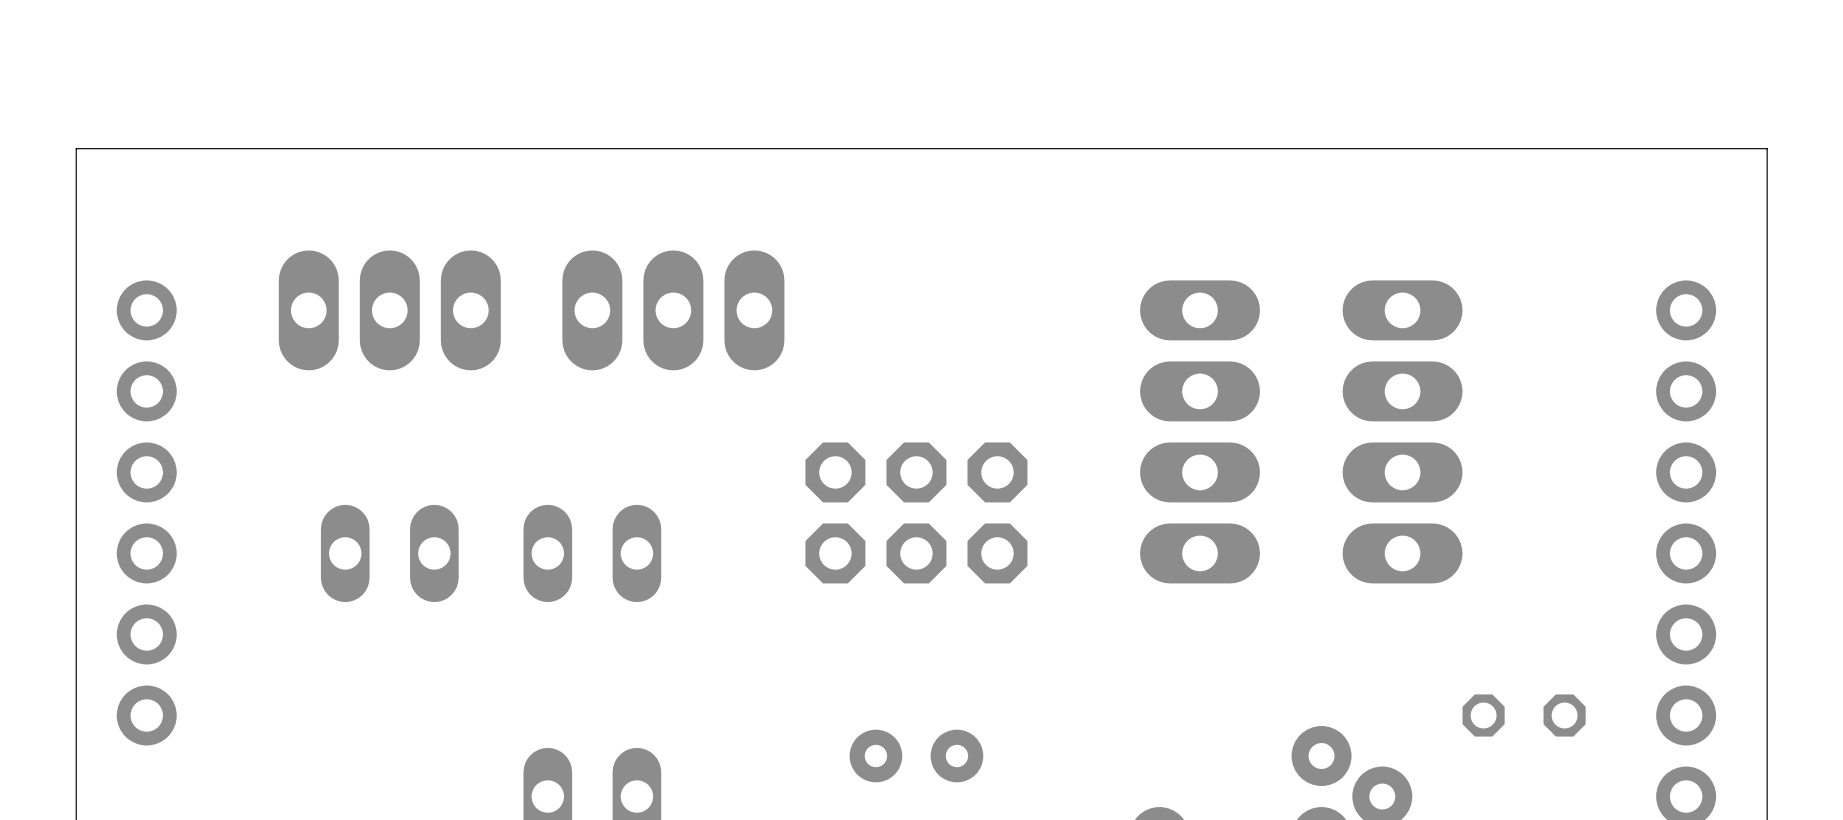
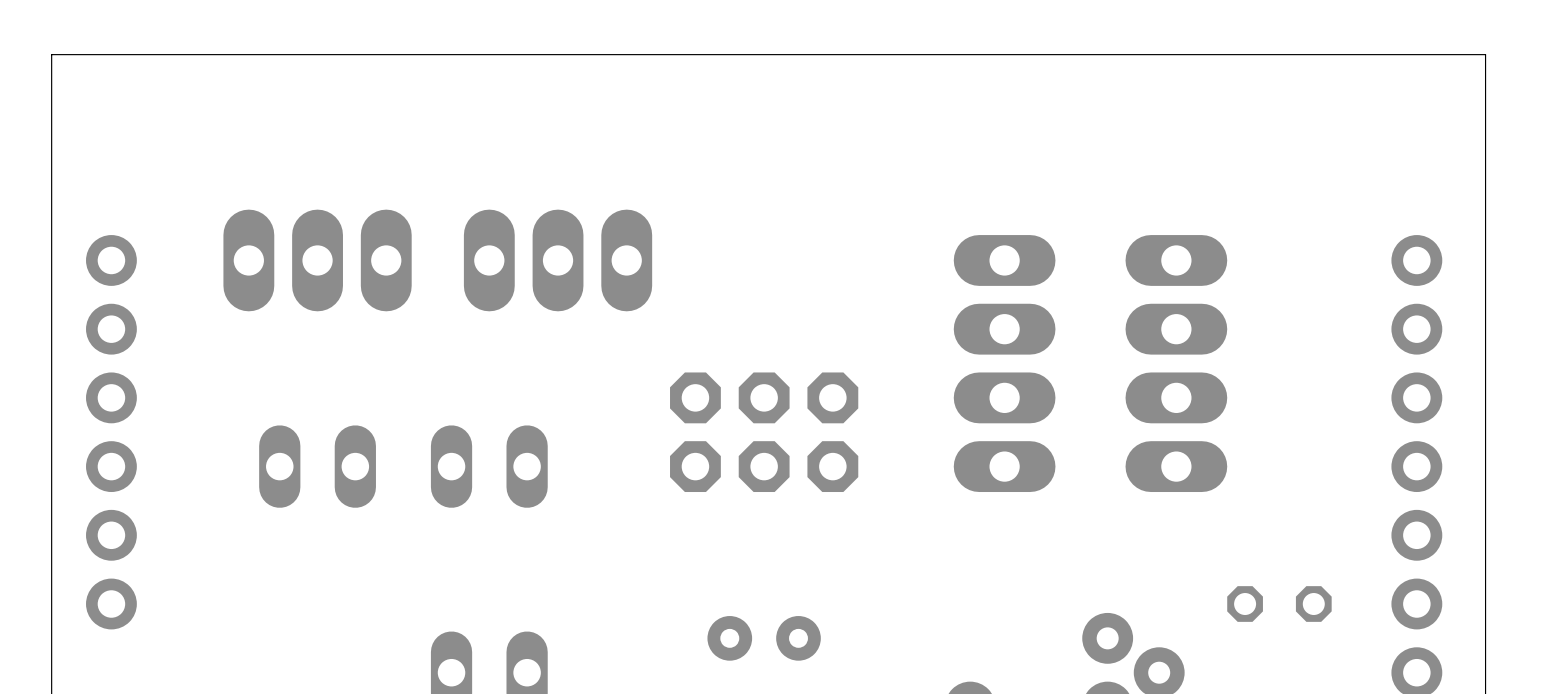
board edge: (1767, 148) (76, 148) -> (1485, 123) (1485, 54) (51, 54) (51, 123)

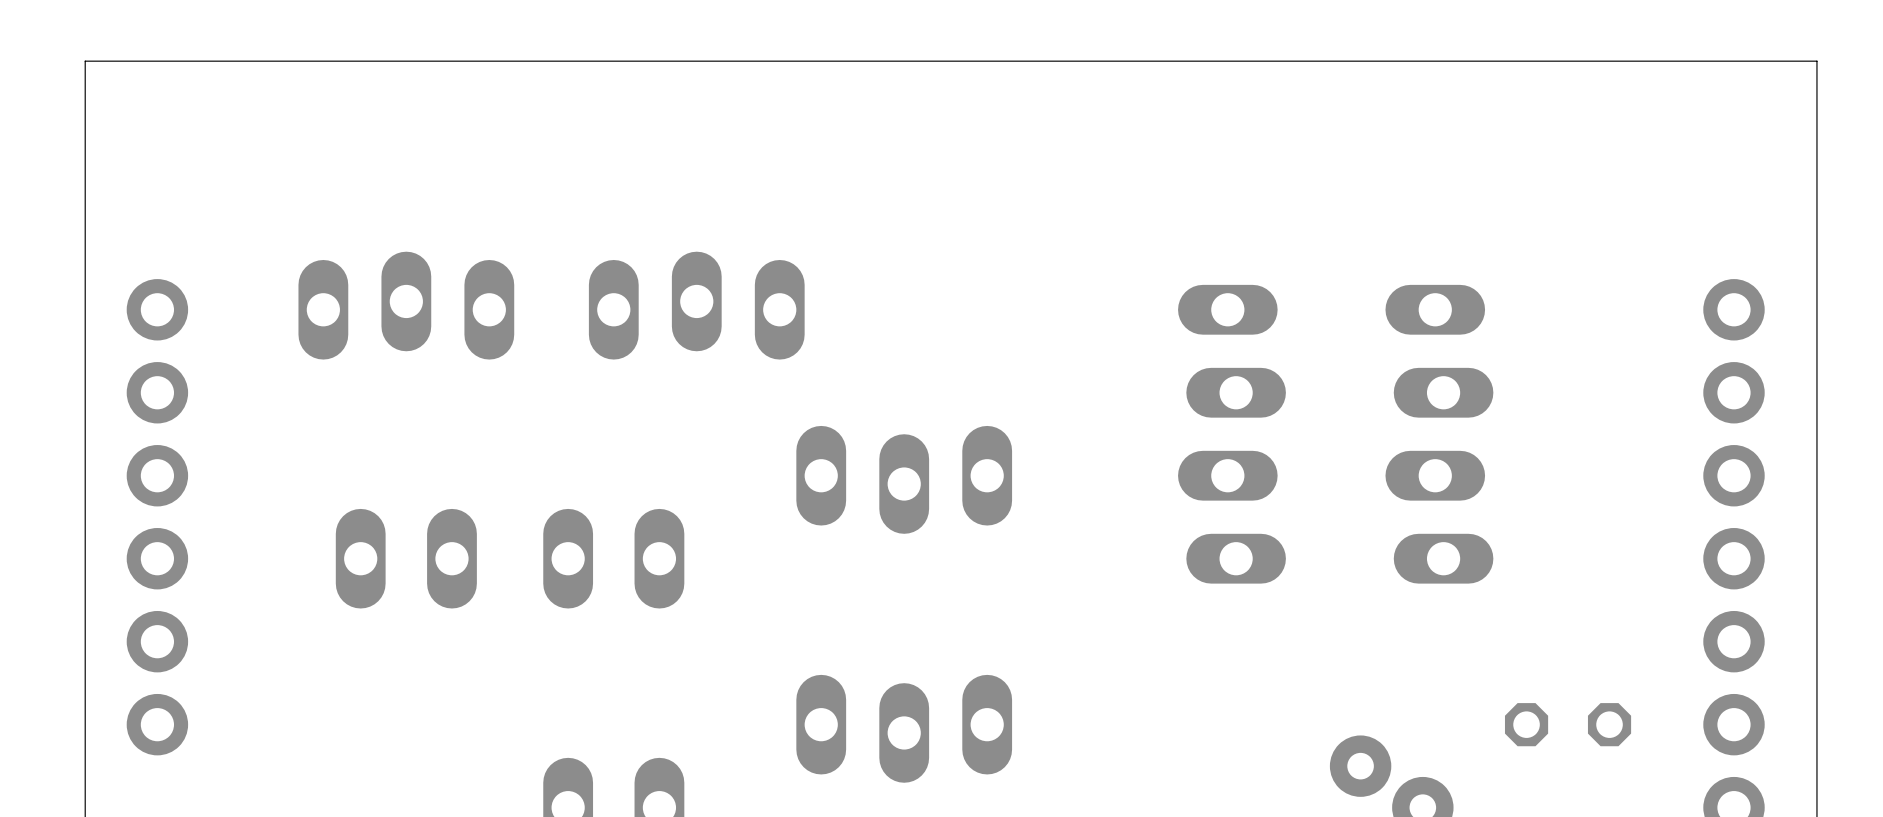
part footprint: [223, 209, 412, 312] -> [298, 251, 515, 360]
part footprint: [463, 209, 653, 312] -> [588, 251, 805, 360]
part footprint: [953, 235, 1056, 493] -> [1178, 284, 1286, 584]
part footprint: [1125, 235, 1228, 493] -> [1385, 284, 1494, 584]
part: none -> (904, 479)
part: (764, 432) -> none
part: none -> (904, 728)
part: (764, 638) -> none

